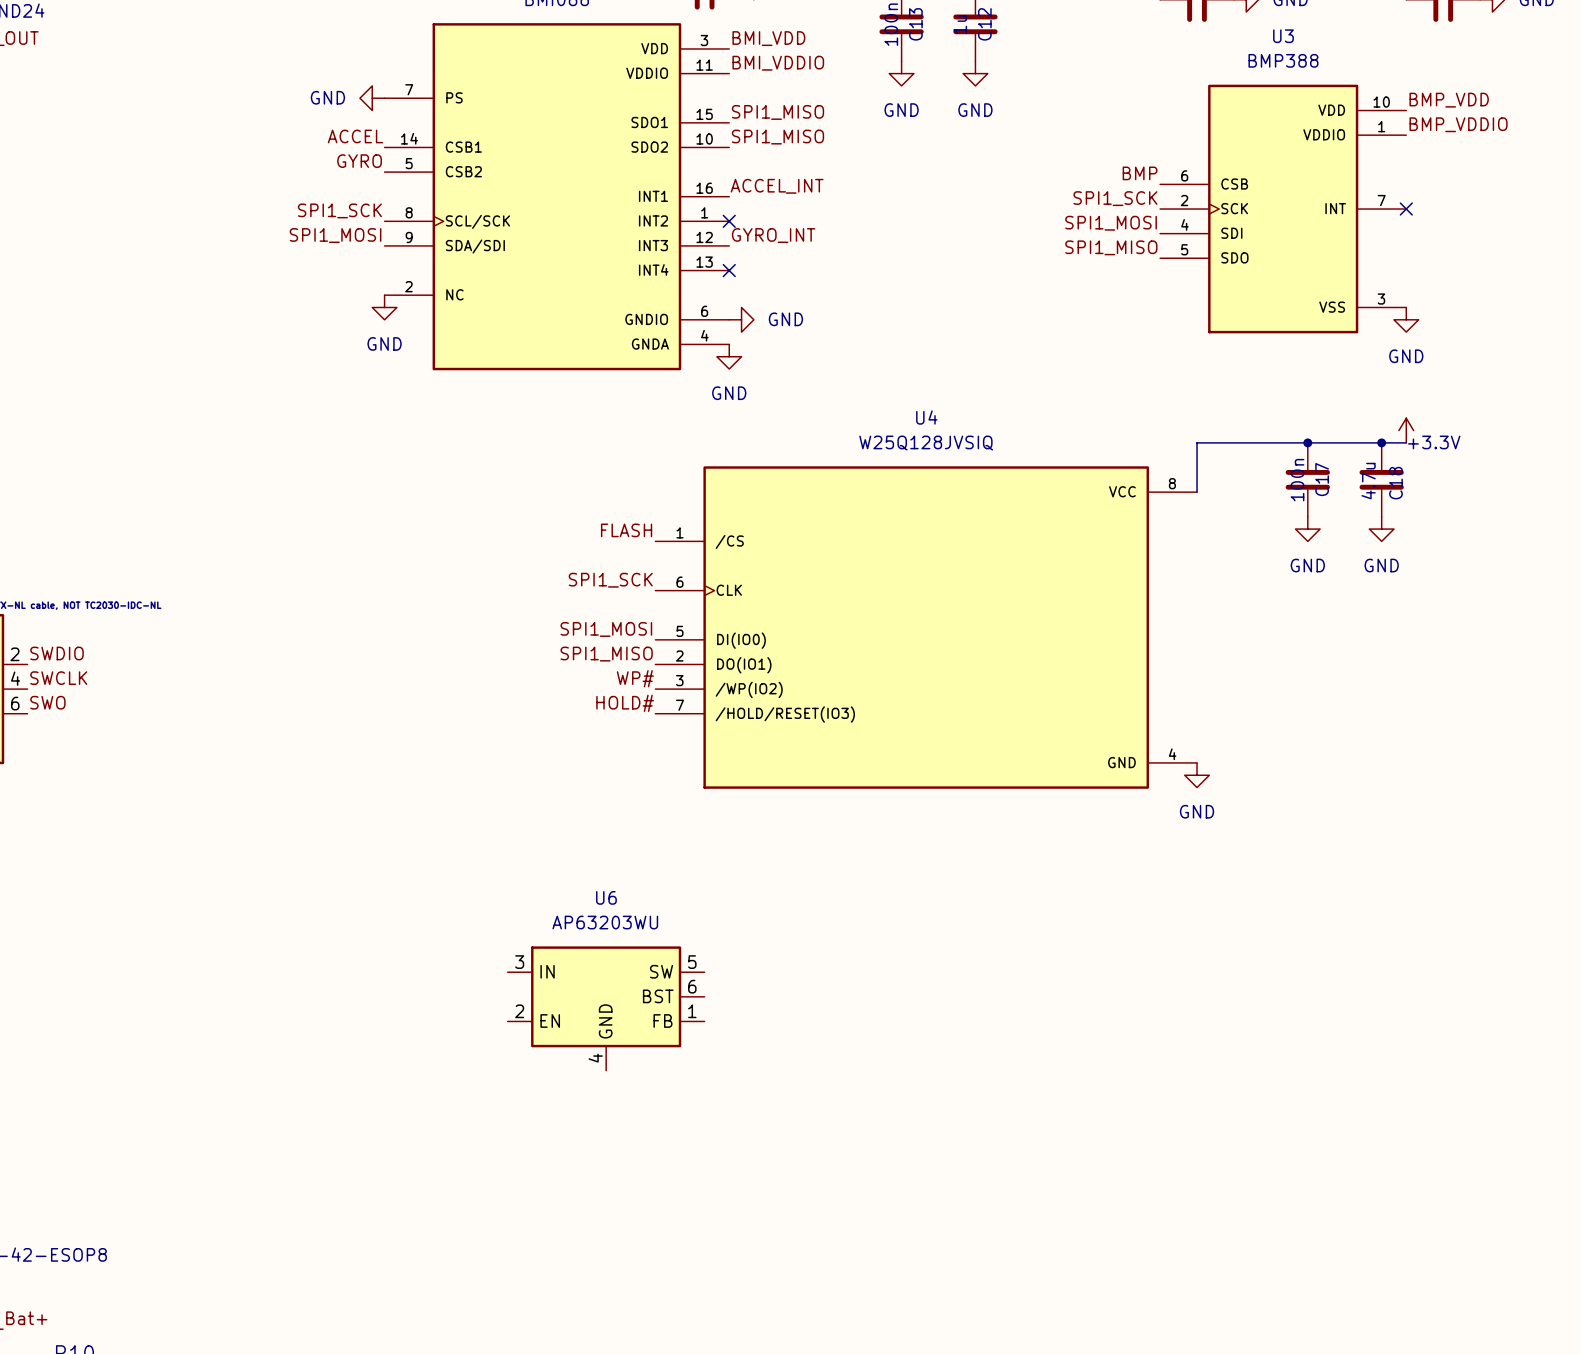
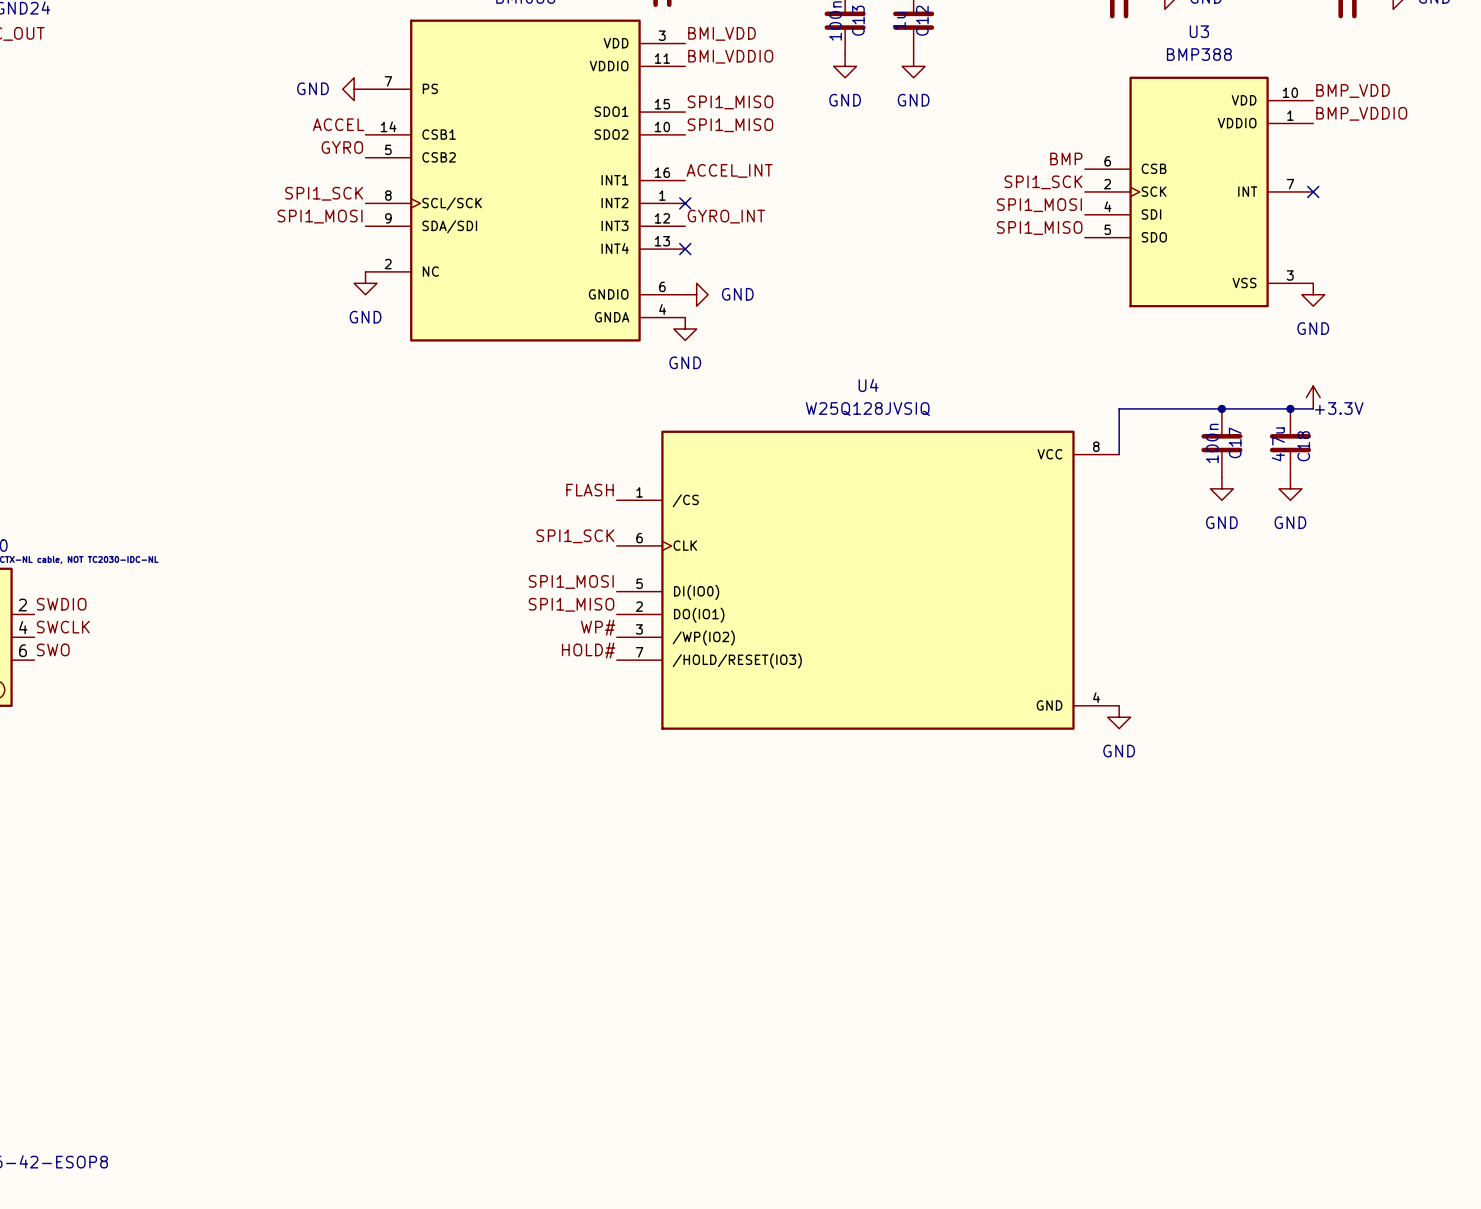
U6: AP63203WU (606, 1008) -> none

